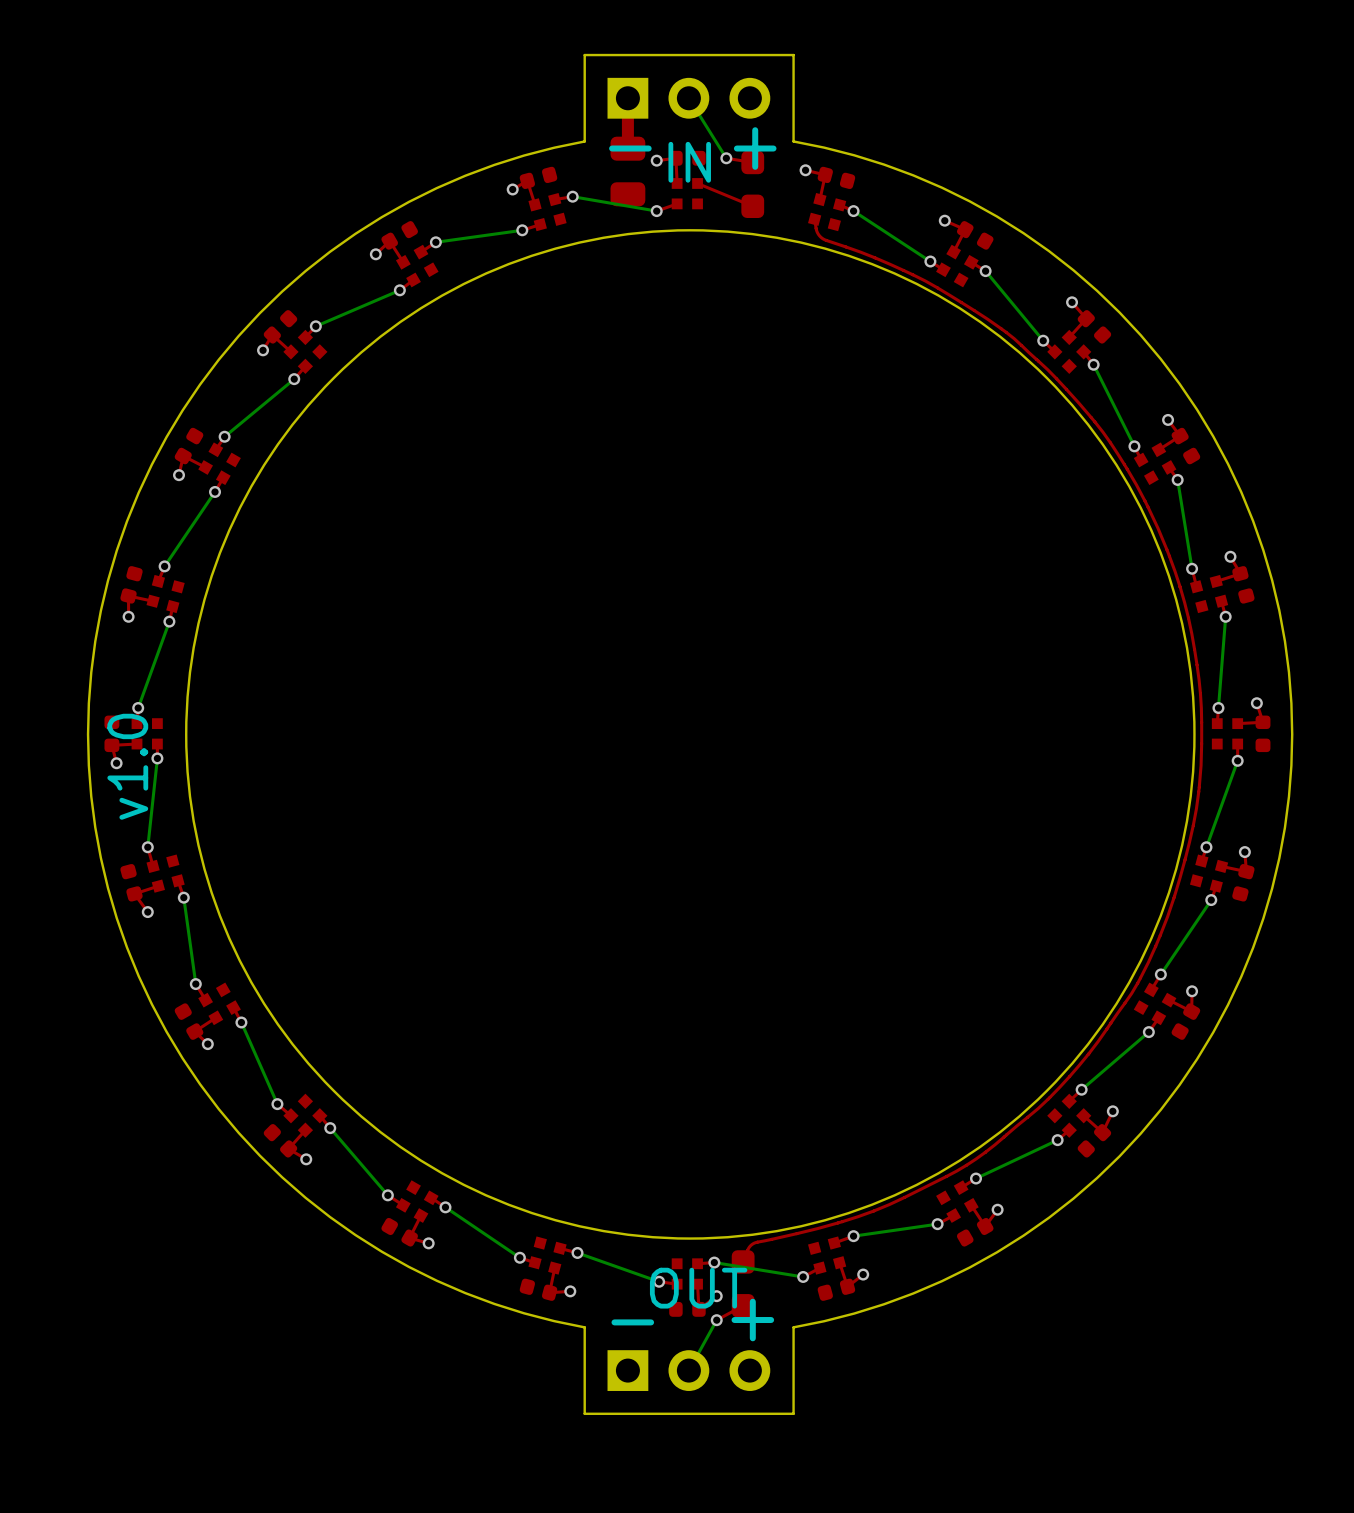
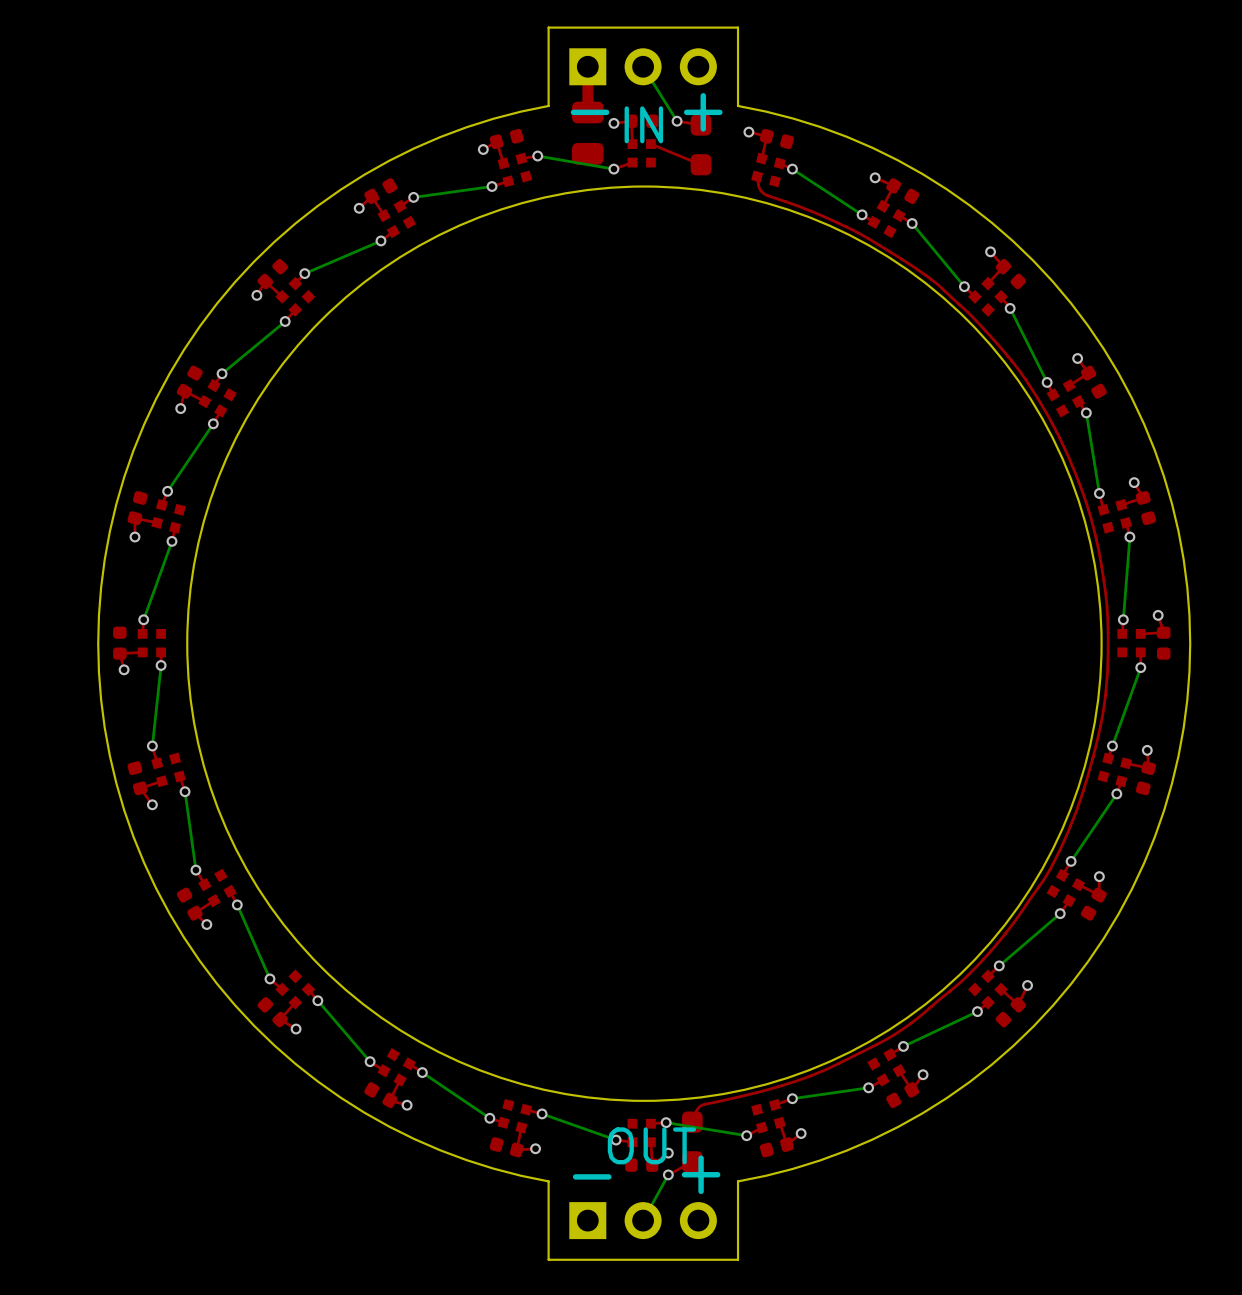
text: v1.0 (127, 766) -> none

